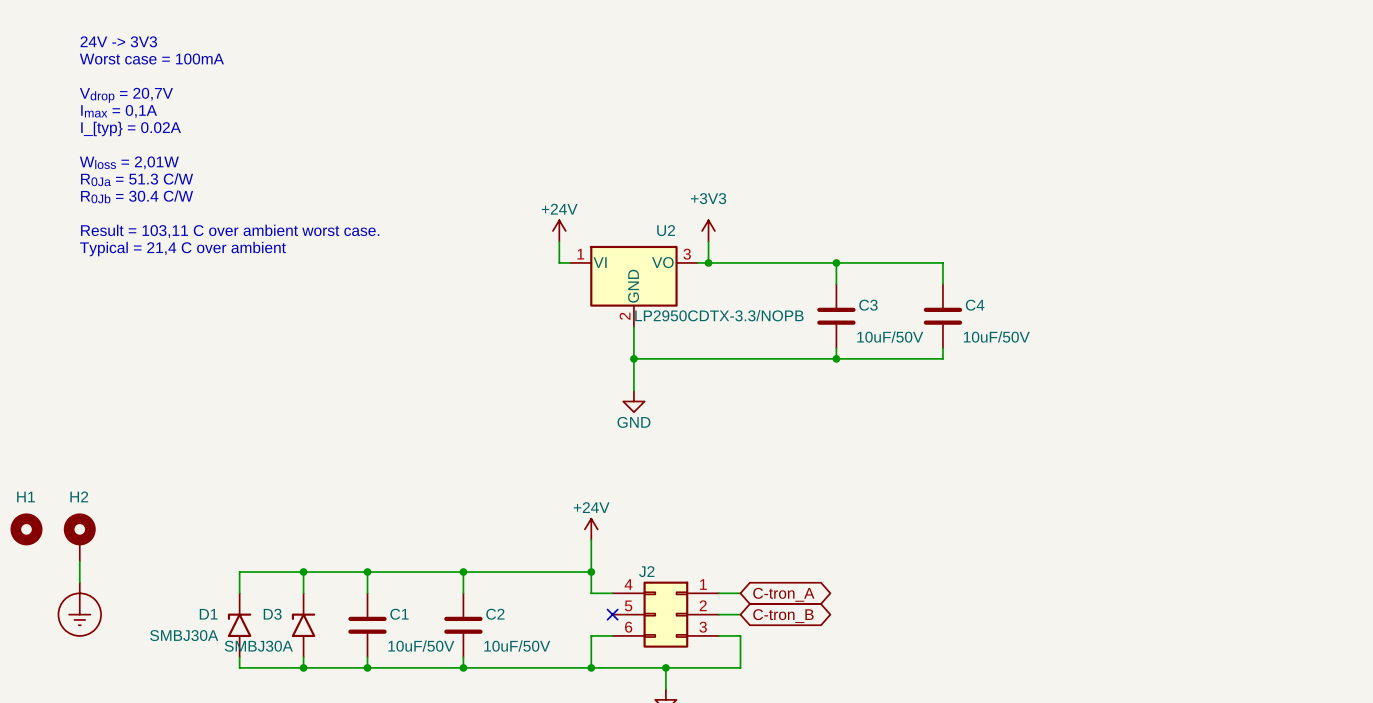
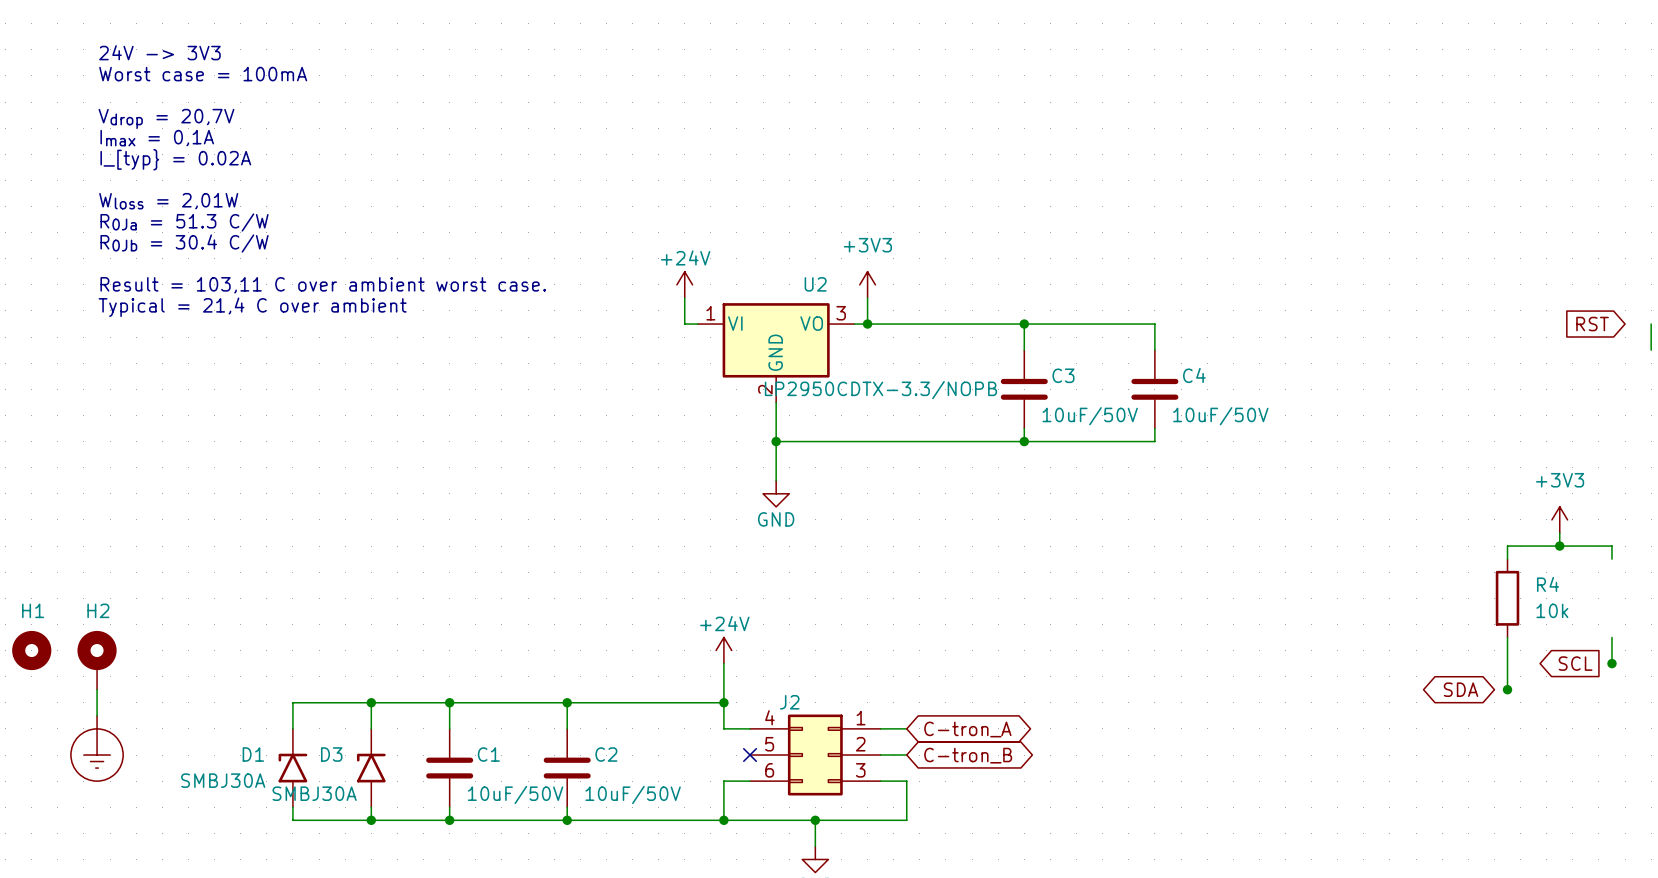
global label: none -> RST (1592, 324)
wire: none -> (1651, 324) (1651, 350)
power symbol: none -> +3V3 (1559, 519)
wire: none -> (1559, 532) (1559, 546)
junction: none -> (1559, 546)
wire: none -> (1507, 559) (1507, 546) (1611, 546) (1611, 559)
R4: none -> 10k (1507, 598)
wire: none -> (1507, 637) (1507, 689)
wire: none -> (1611, 637) (1611, 663)
global label: none -> SCL (1575, 663)
junction: none -> (1611, 663)
global label: none -> SDA (1461, 689)
junction: none -> (1507, 689)

